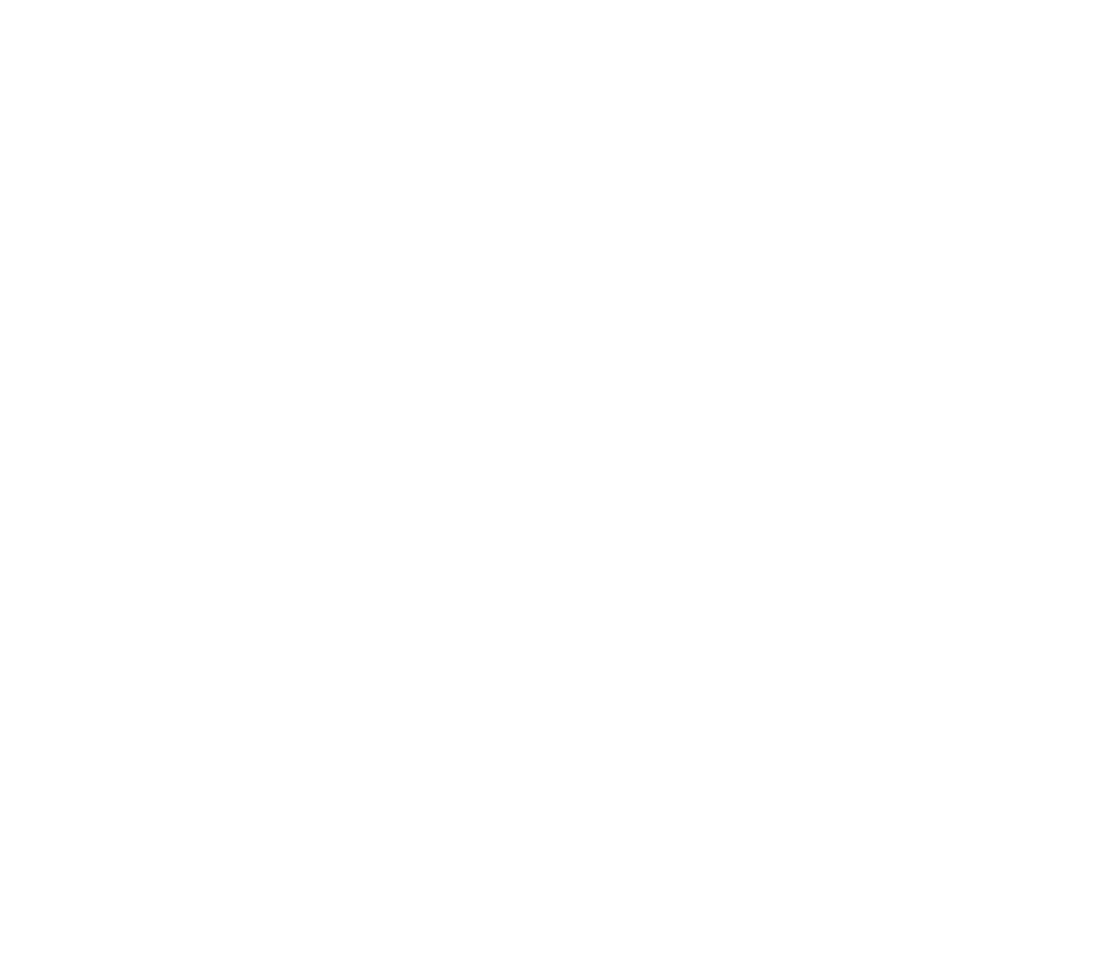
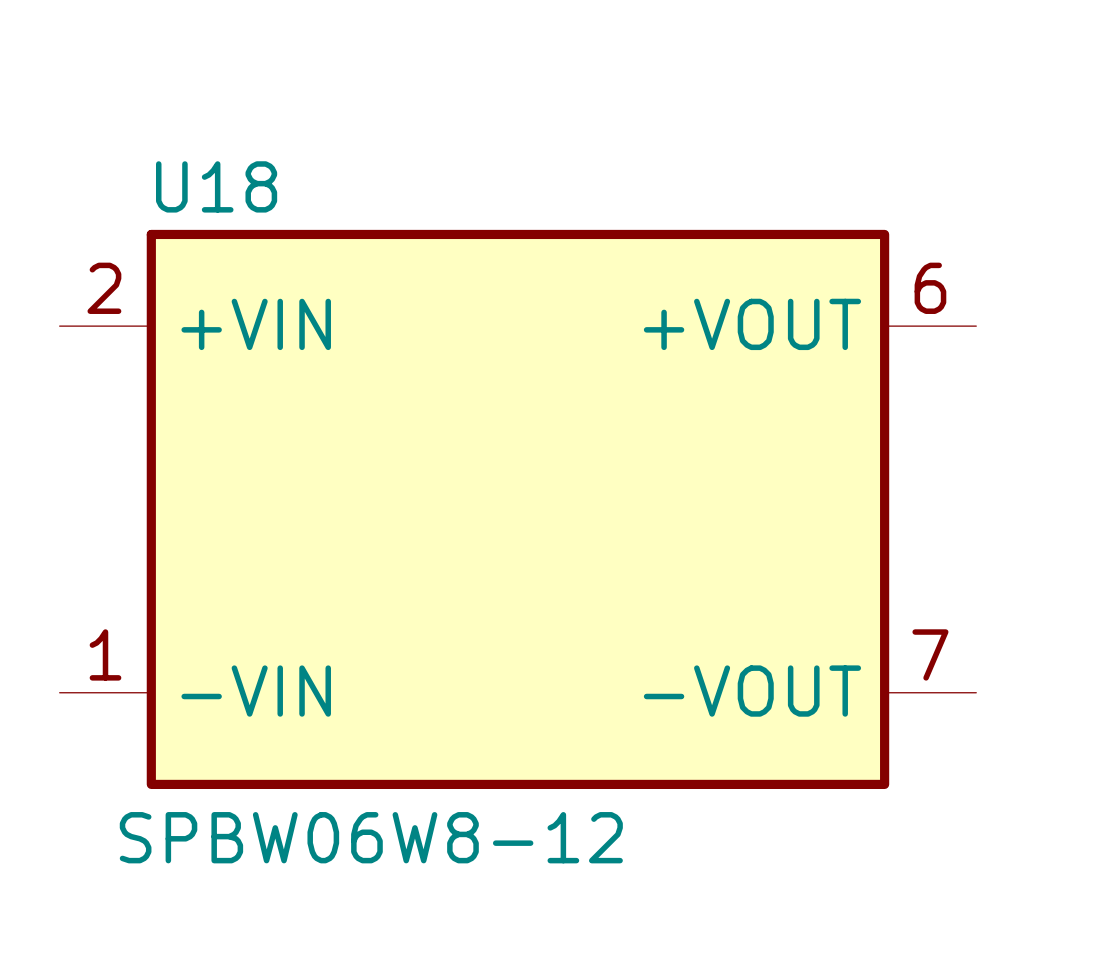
U18: none -> (517, 509)

